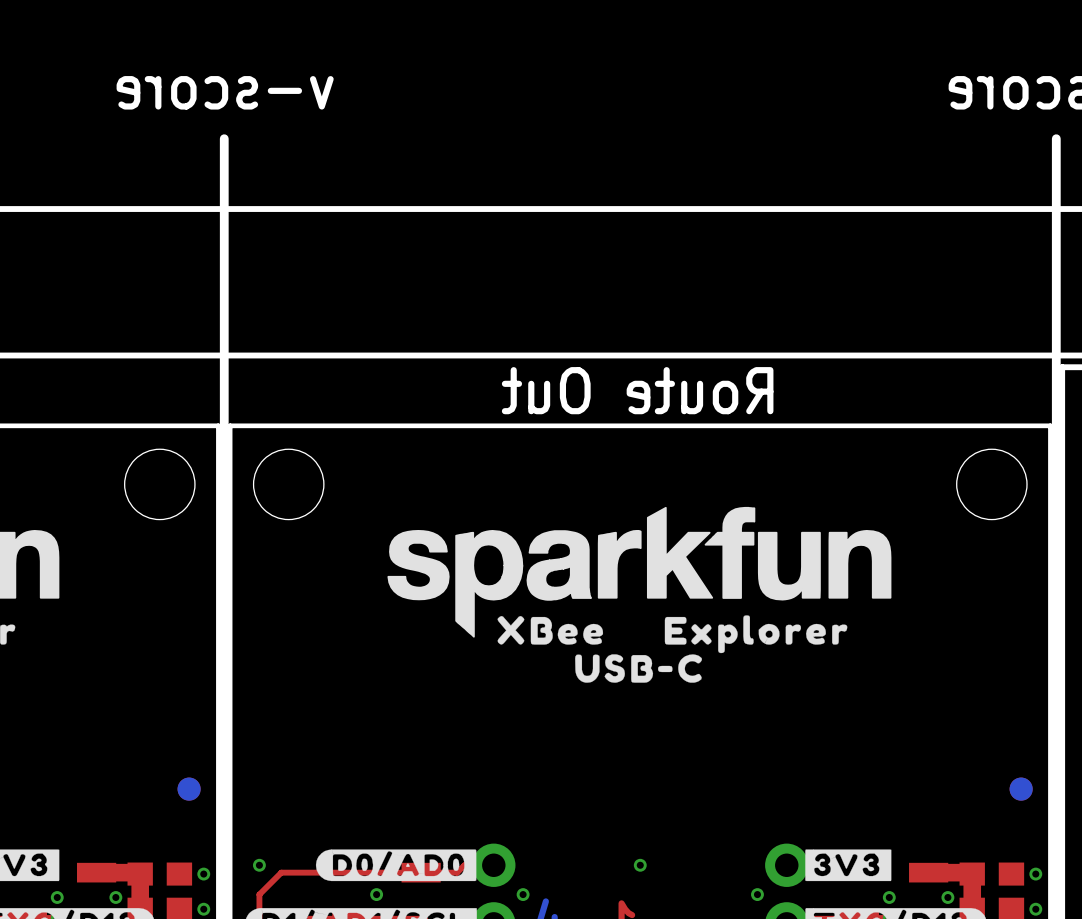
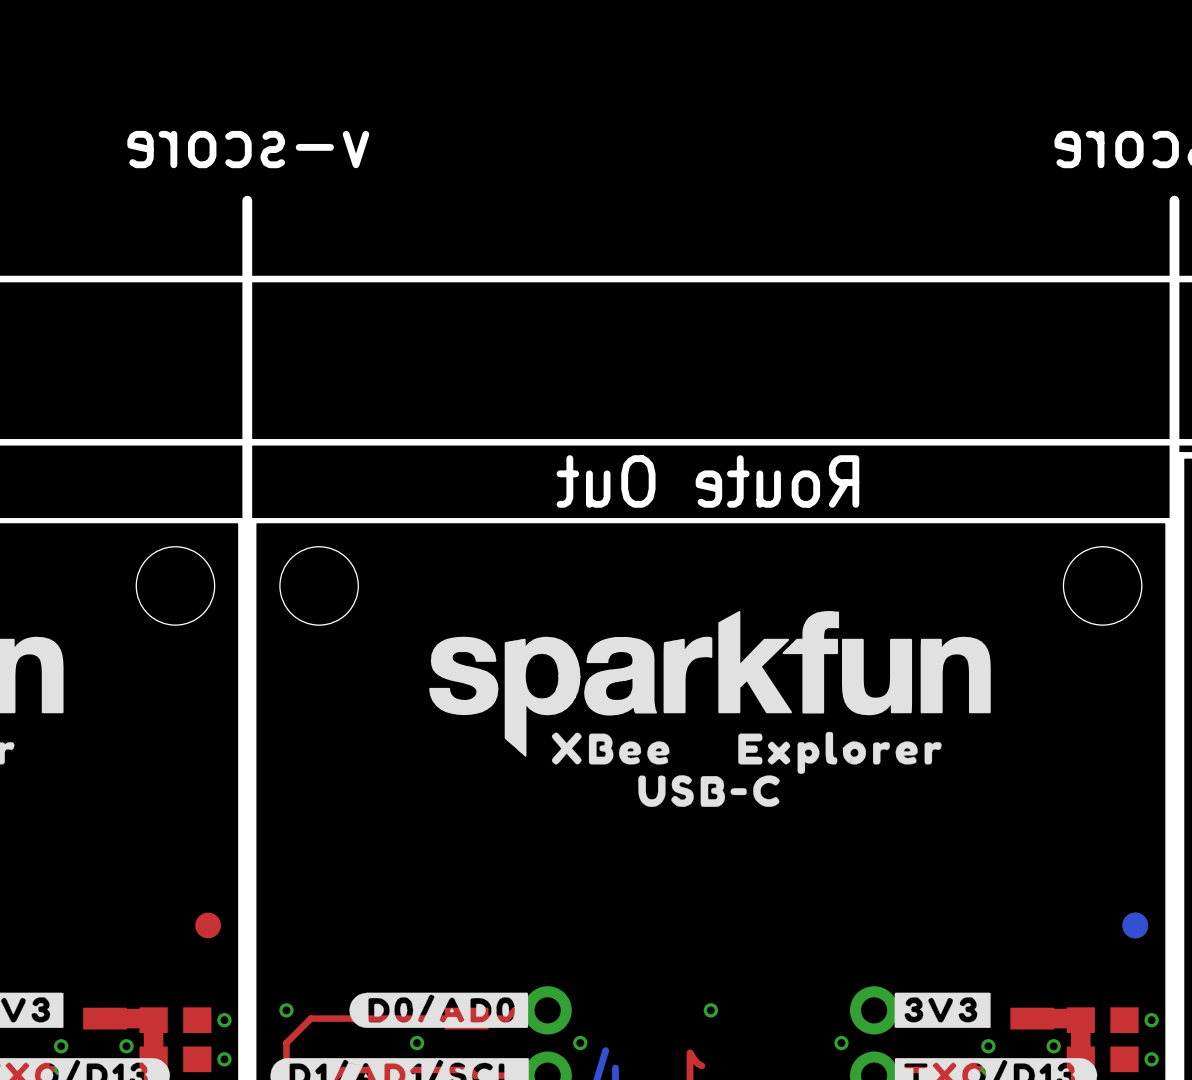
part: (189, 789) -> none

